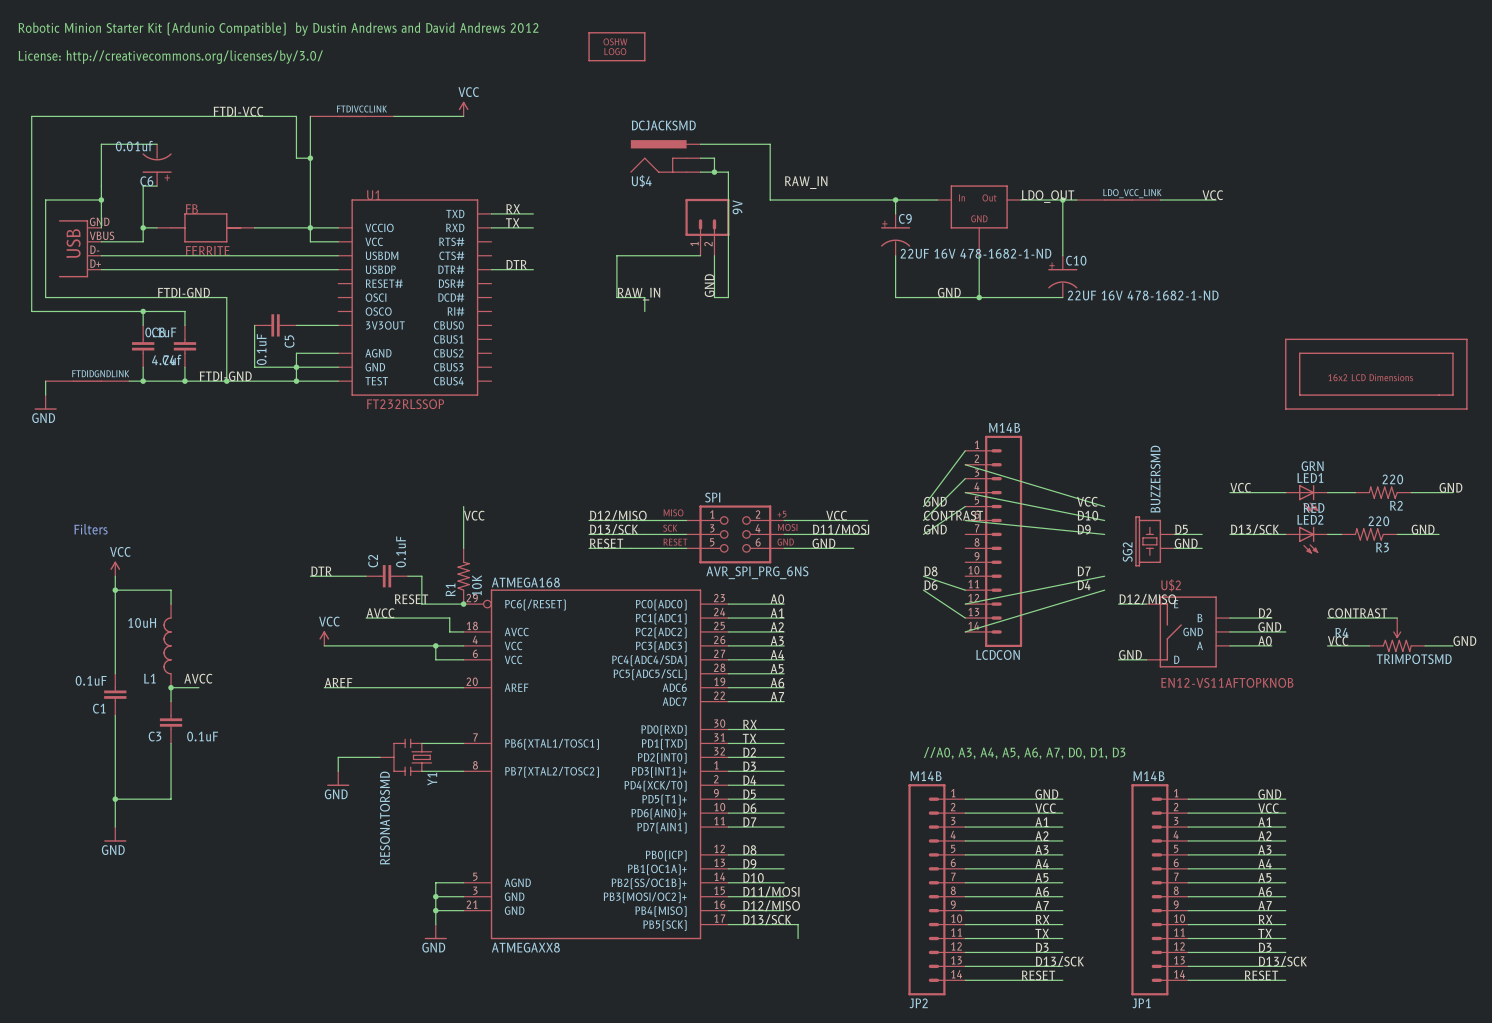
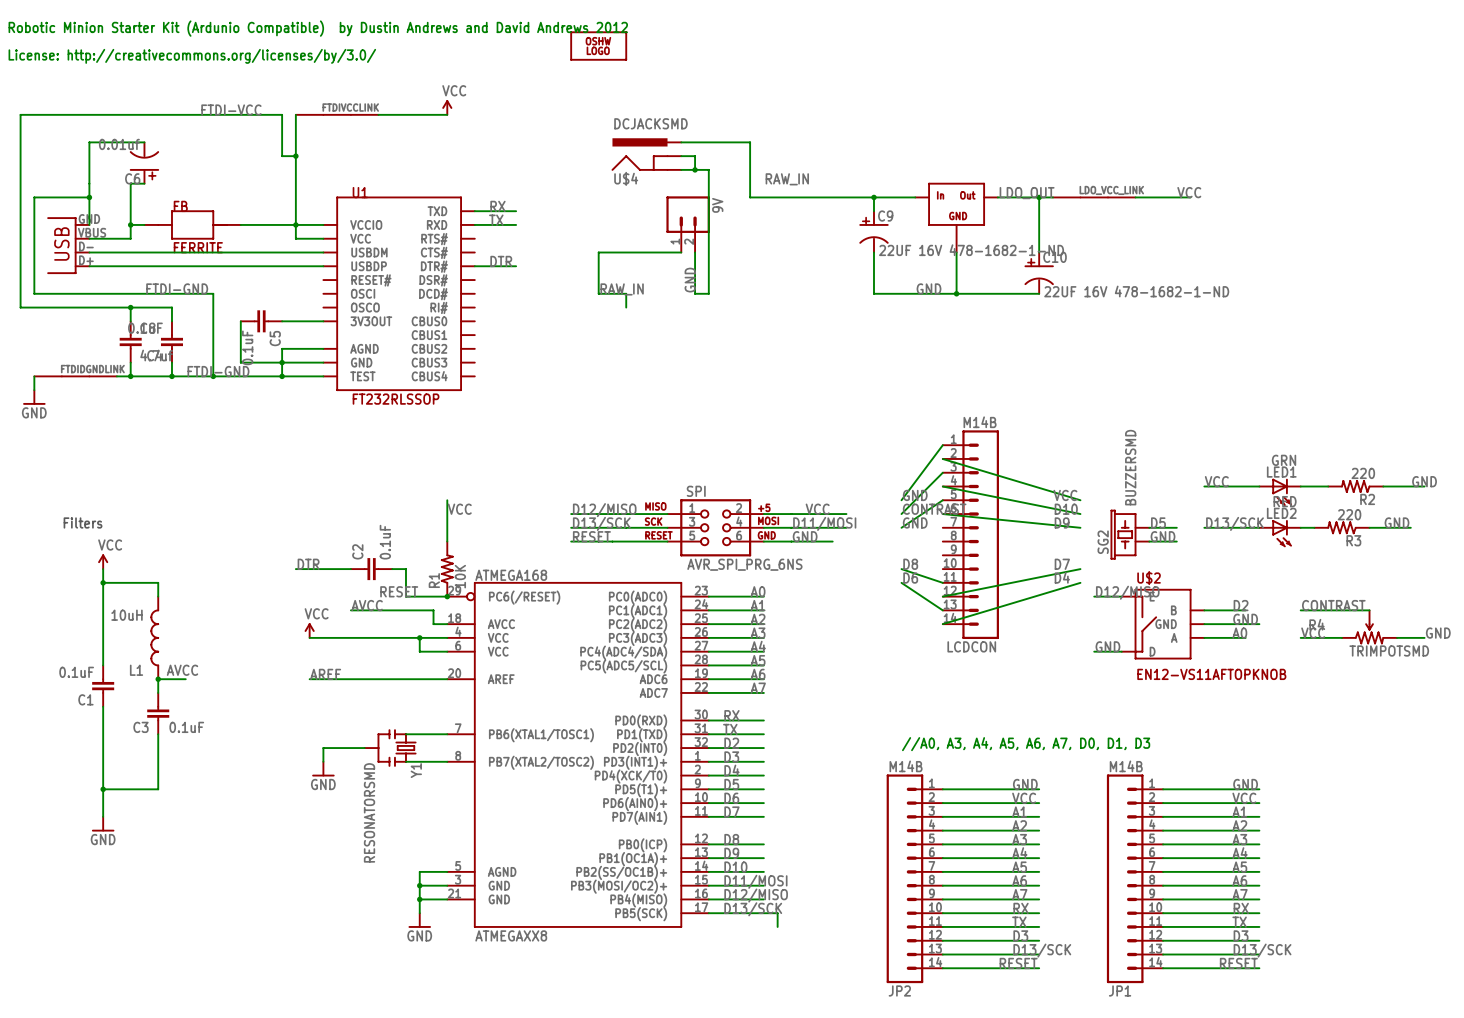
part: (1376, 374) -> none

